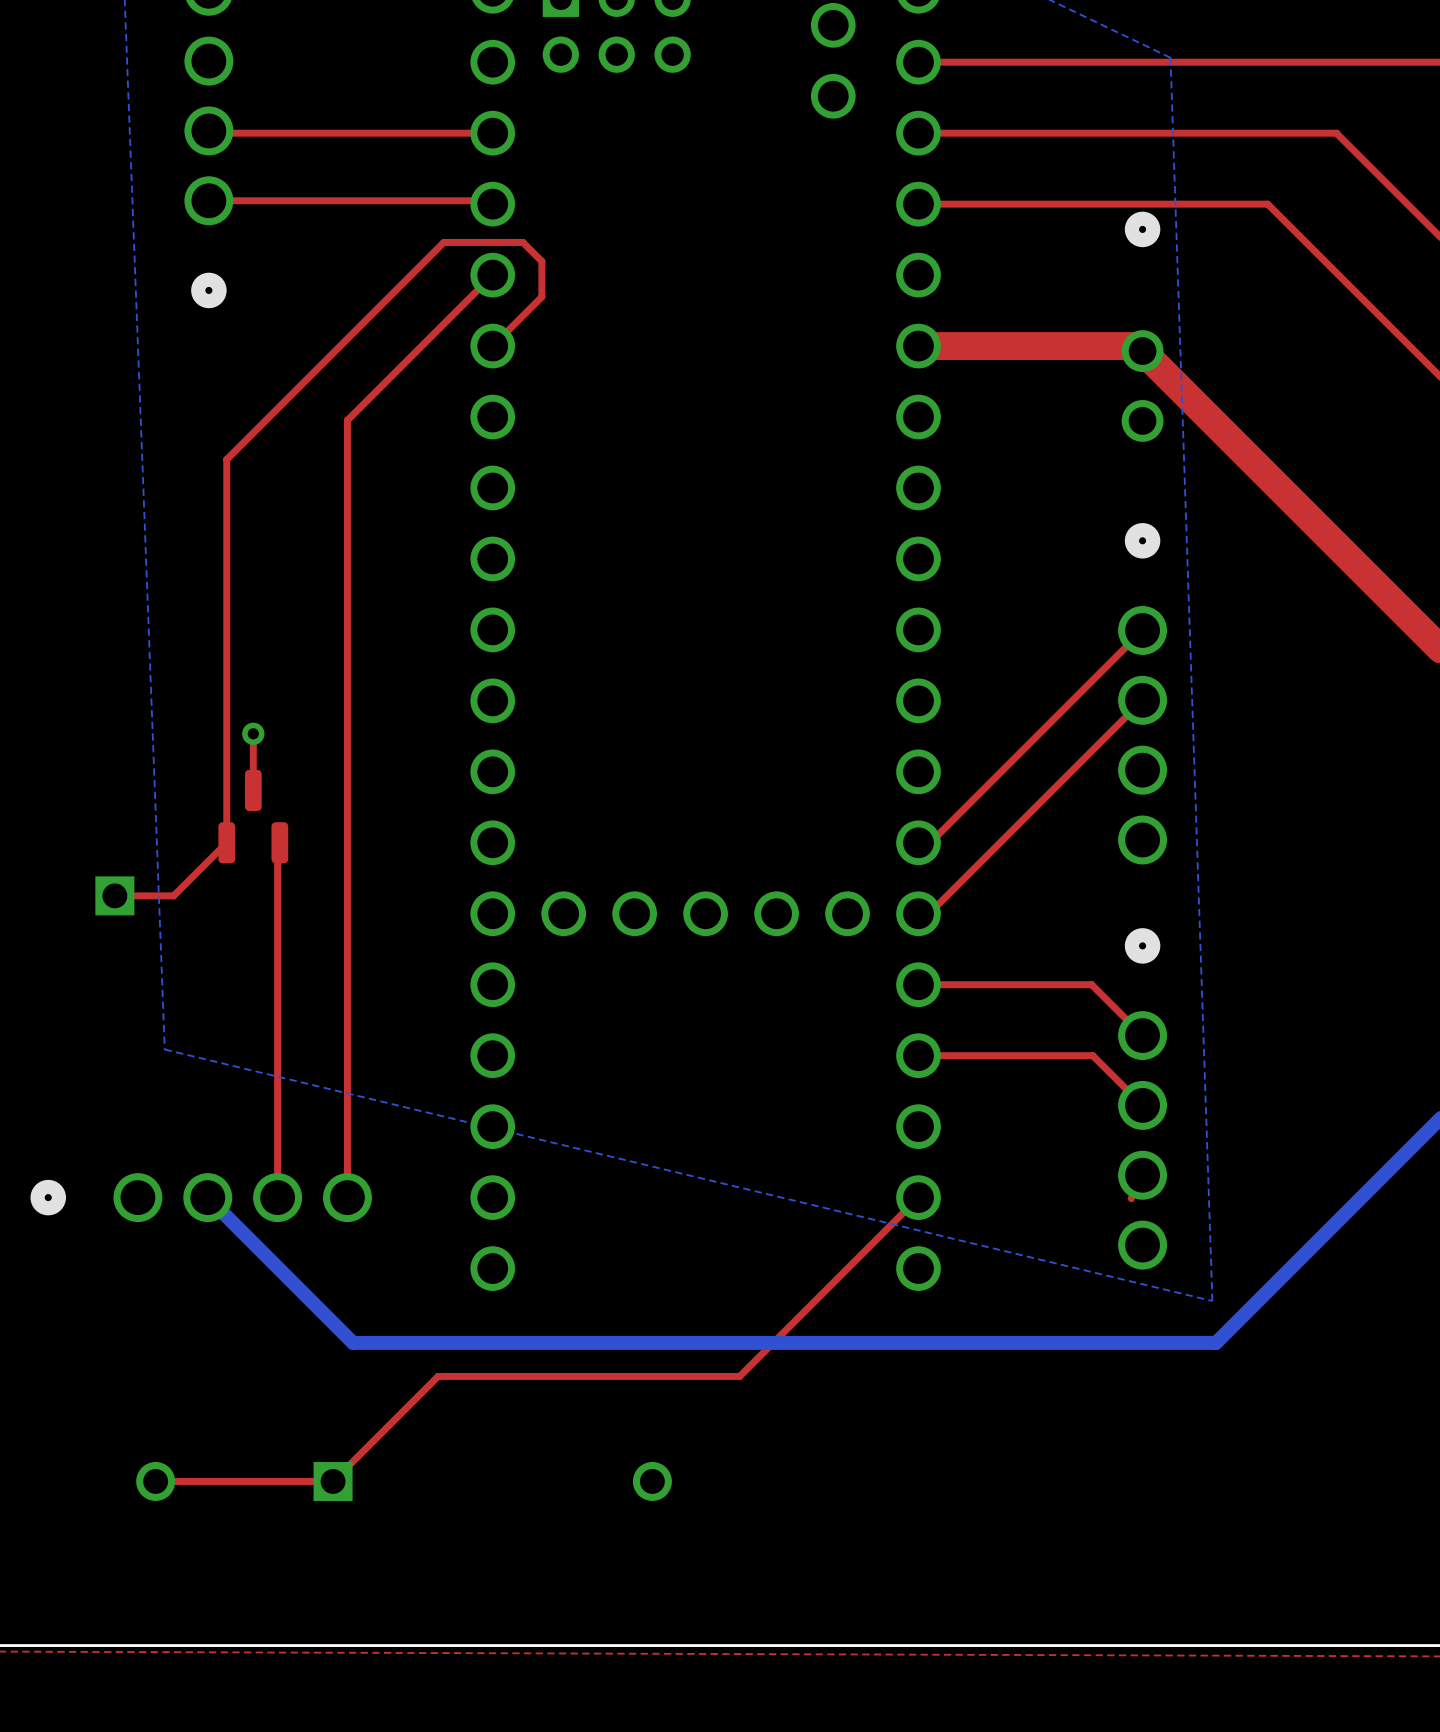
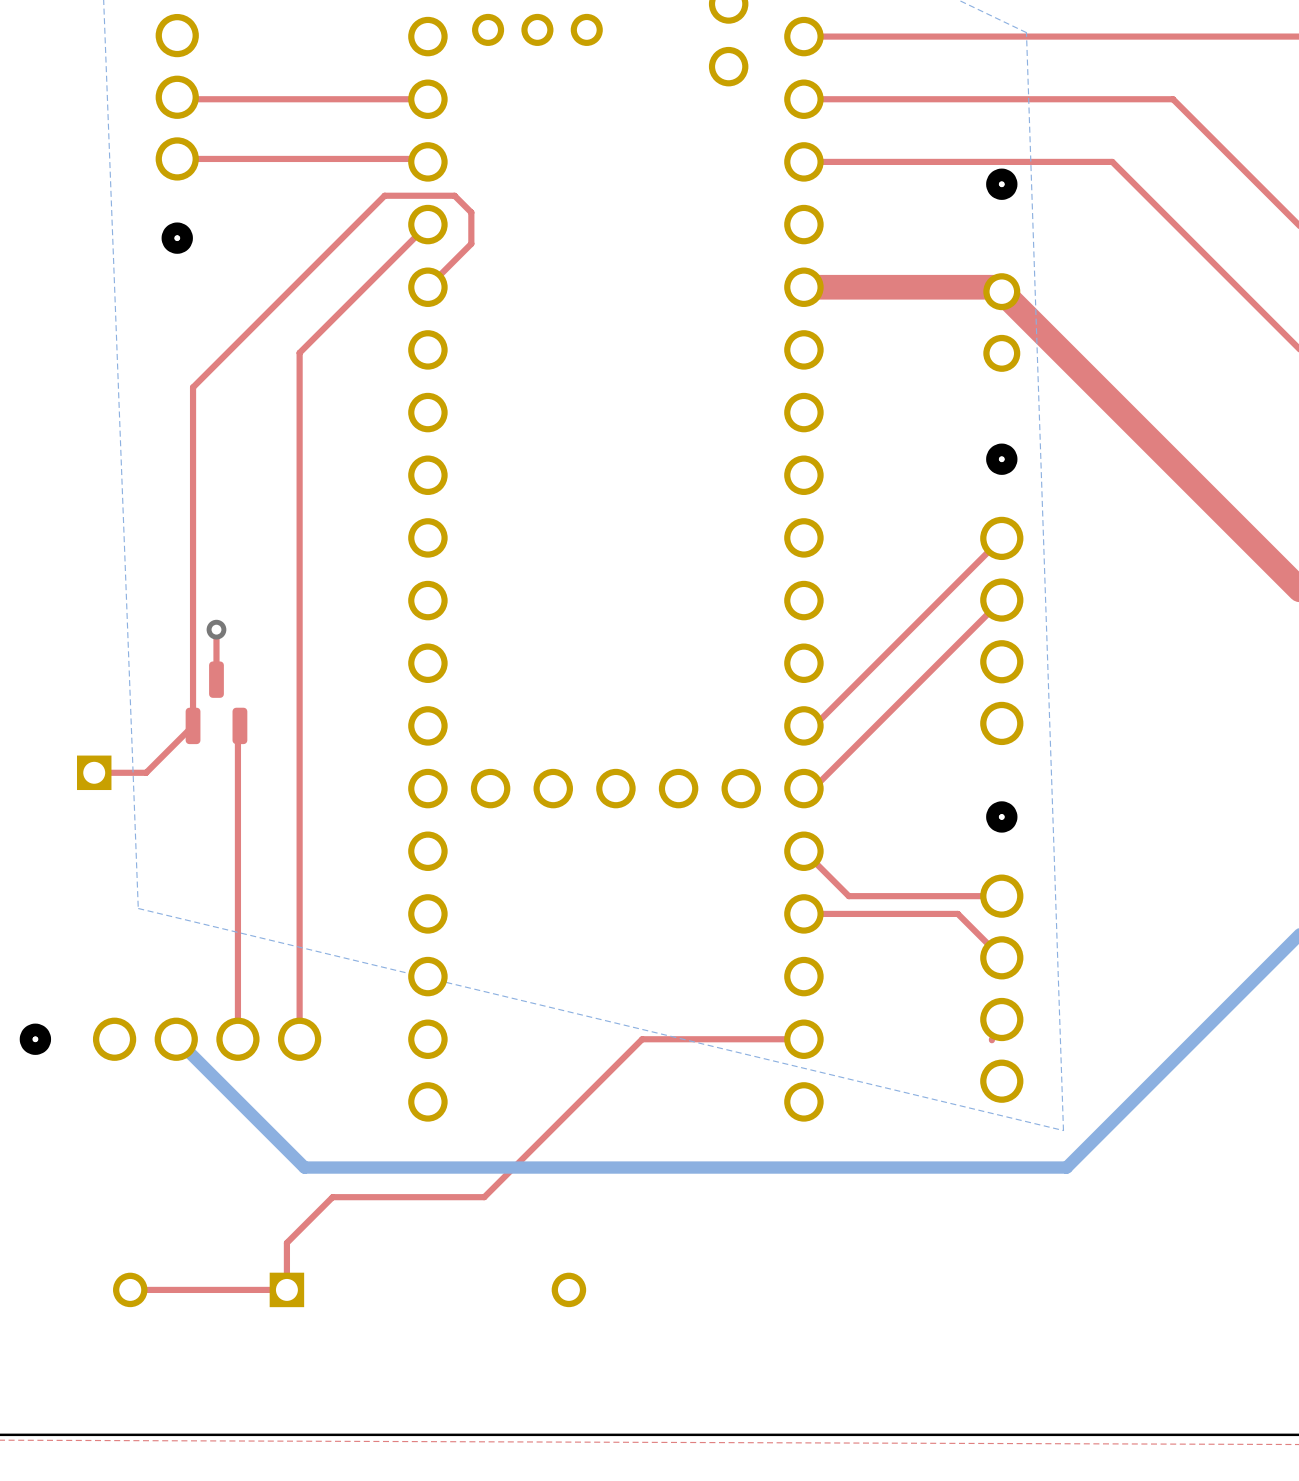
top track: (918, 984) (1091, 984) (1142, 1035) -> (803, 851) (848, 896) (1001, 896)
top track: (918, 1197) (739, 1376) (556, 1376) -> (803, 1039) (642, 1039) (484, 1197)
top track: (438, 1376) (333, 1481) -> (379, 1197) (332, 1197) (286, 1242) (286, 1289)

